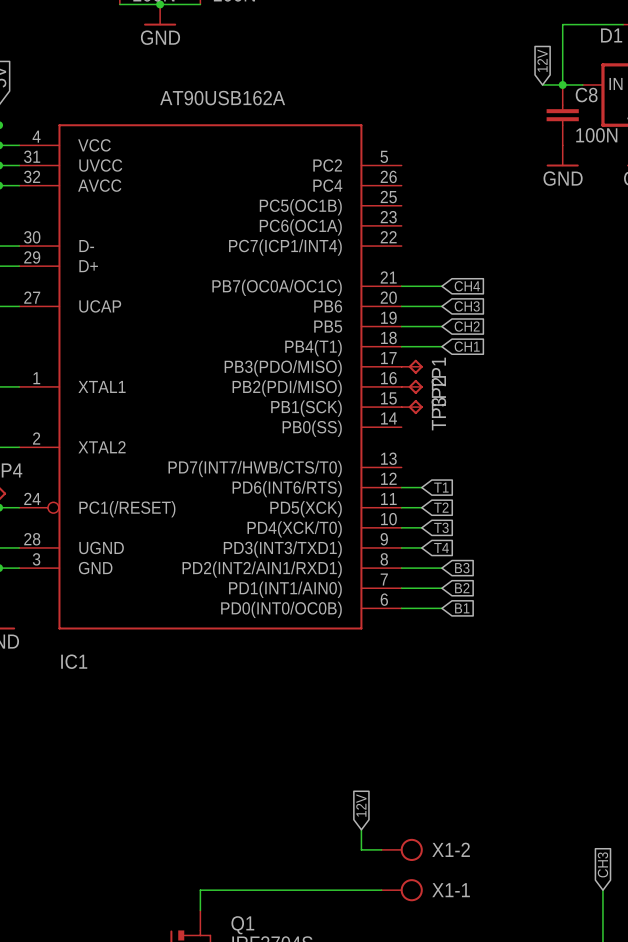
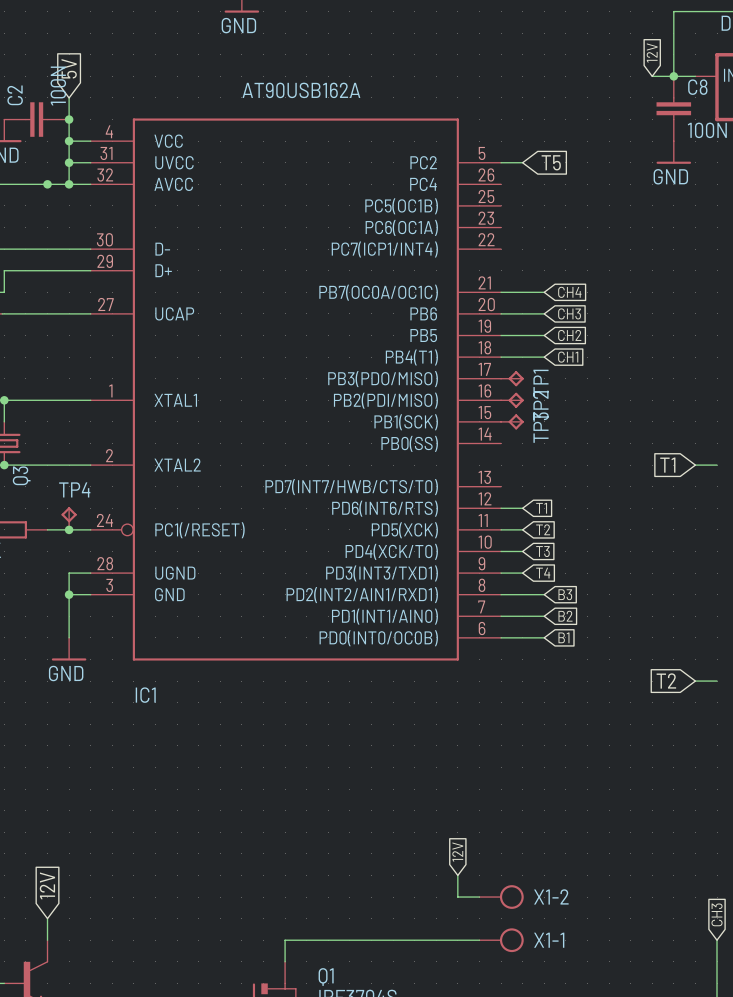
wire: none -> (501, 162) (522, 162)
global label: none -> T5 (551, 162)
global label: none -> T1 (667, 465)
wire: none -> (695, 465) (717, 465)
global label: none -> T2 (666, 680)
wire: none -> (695, 681) (717, 681)

